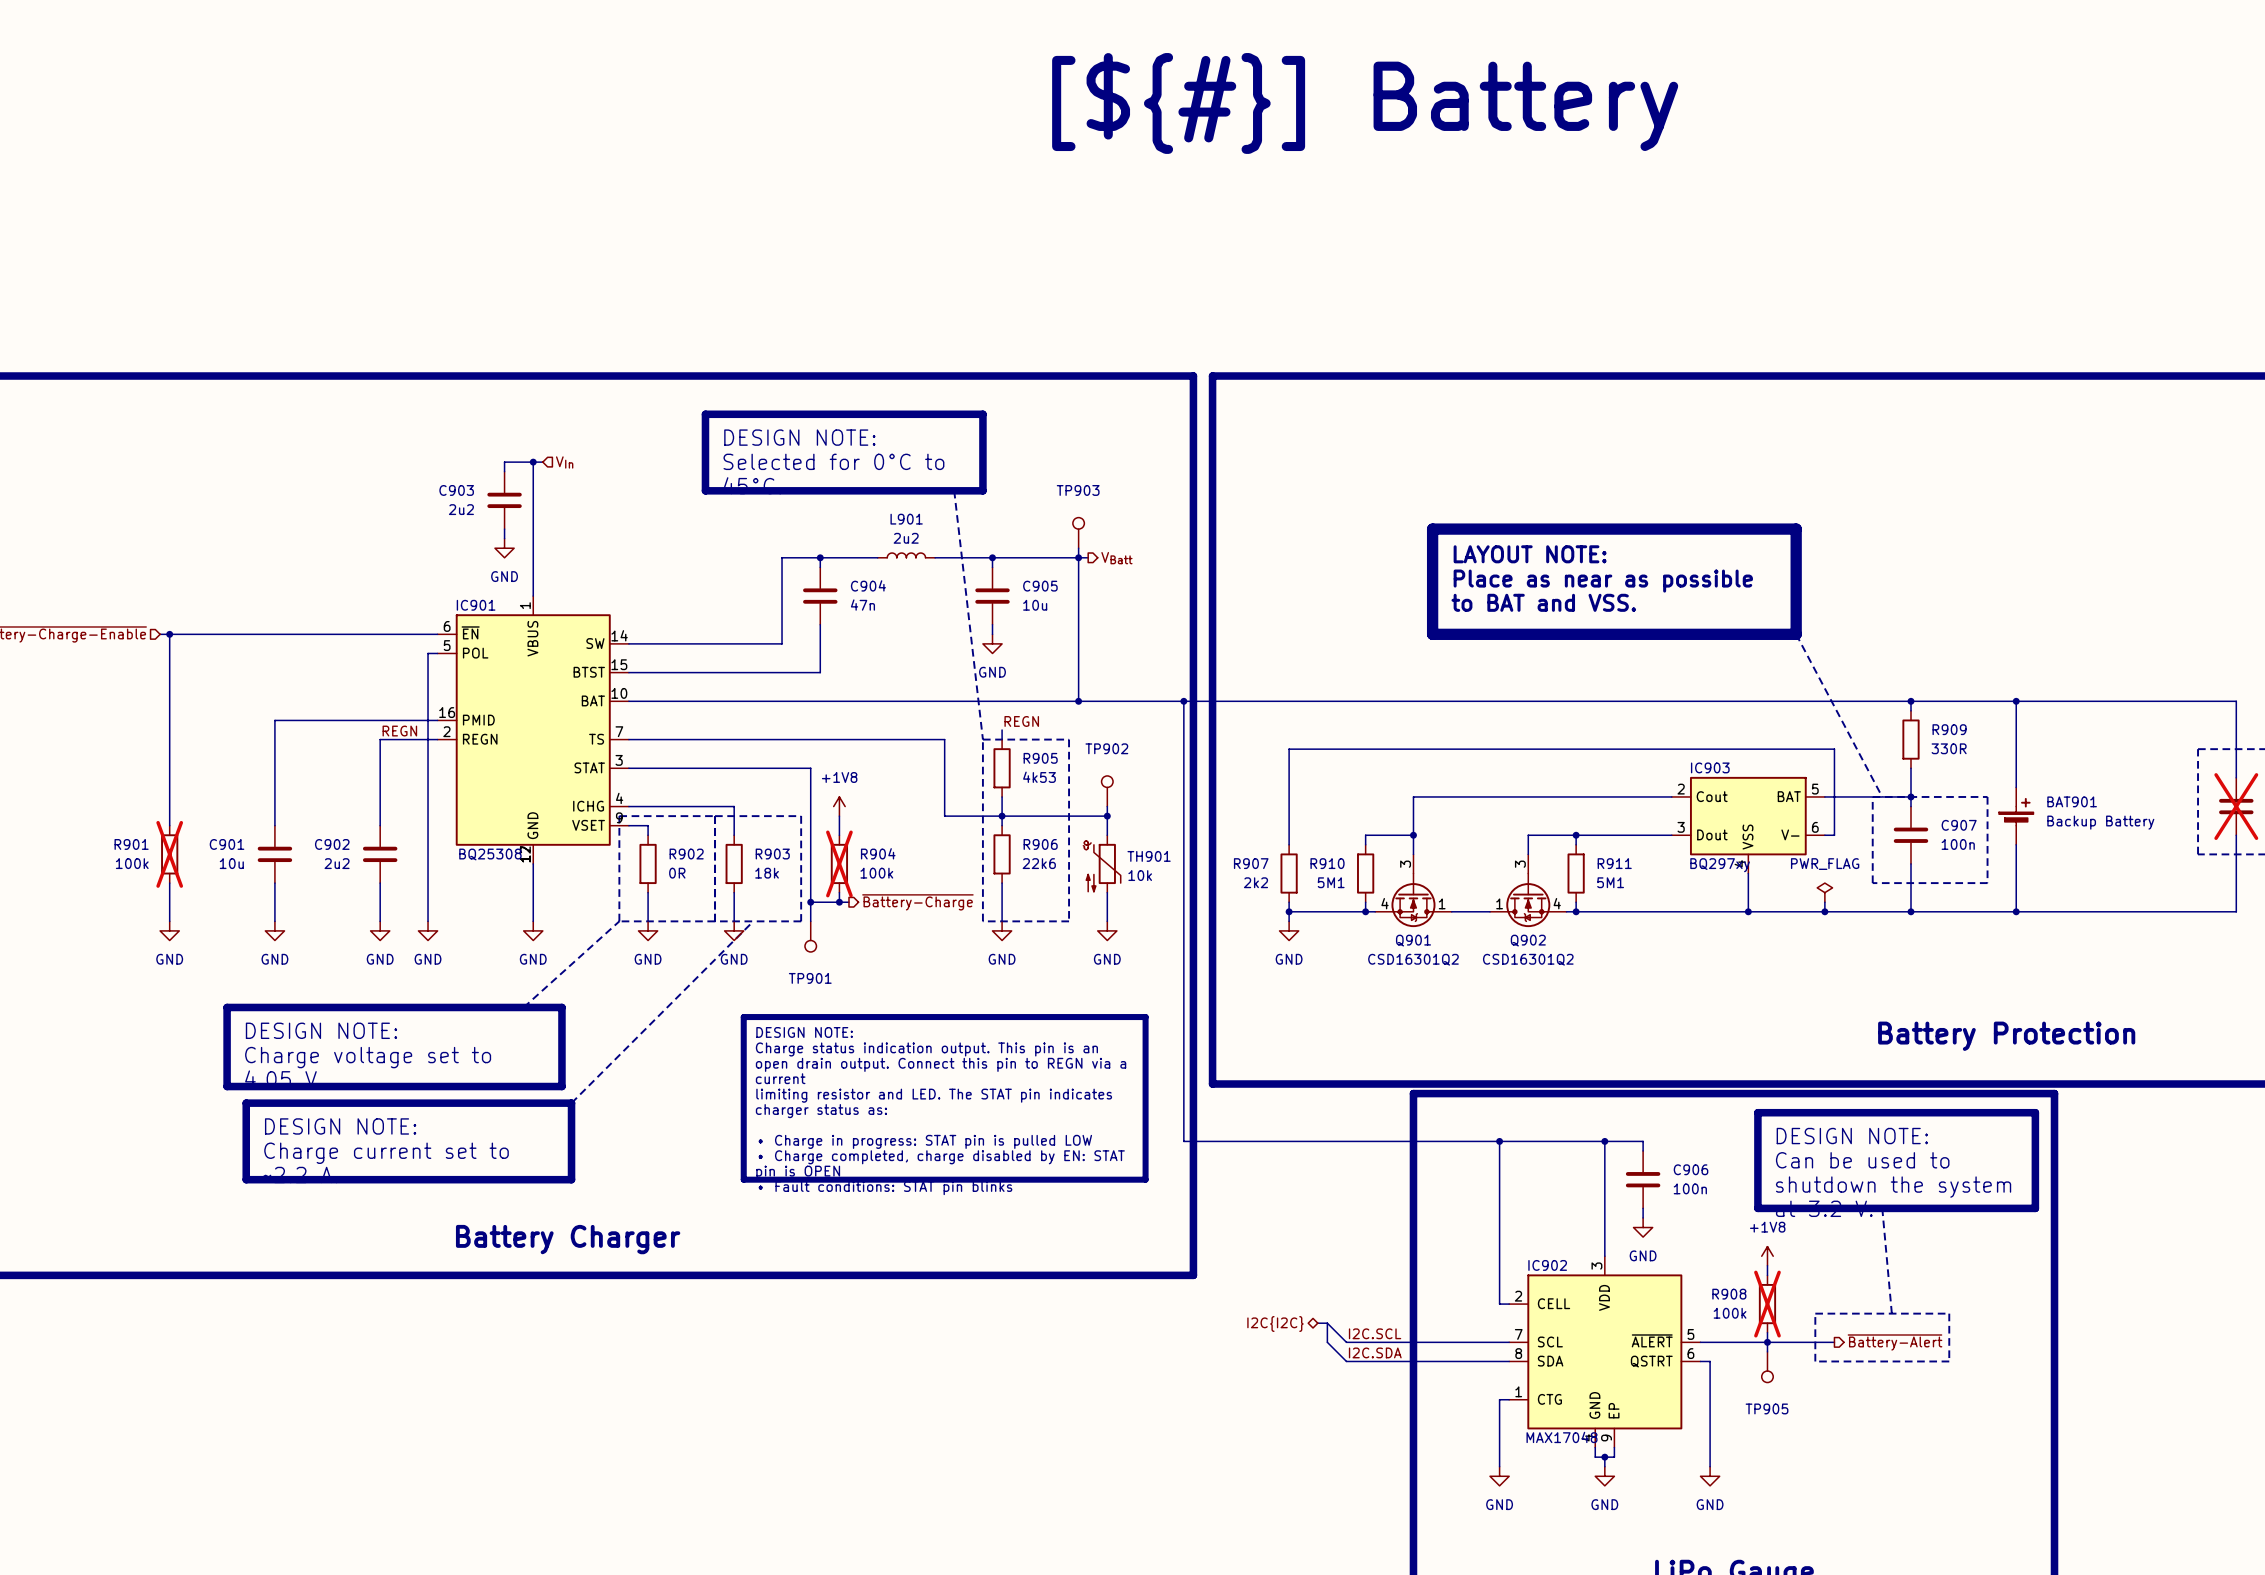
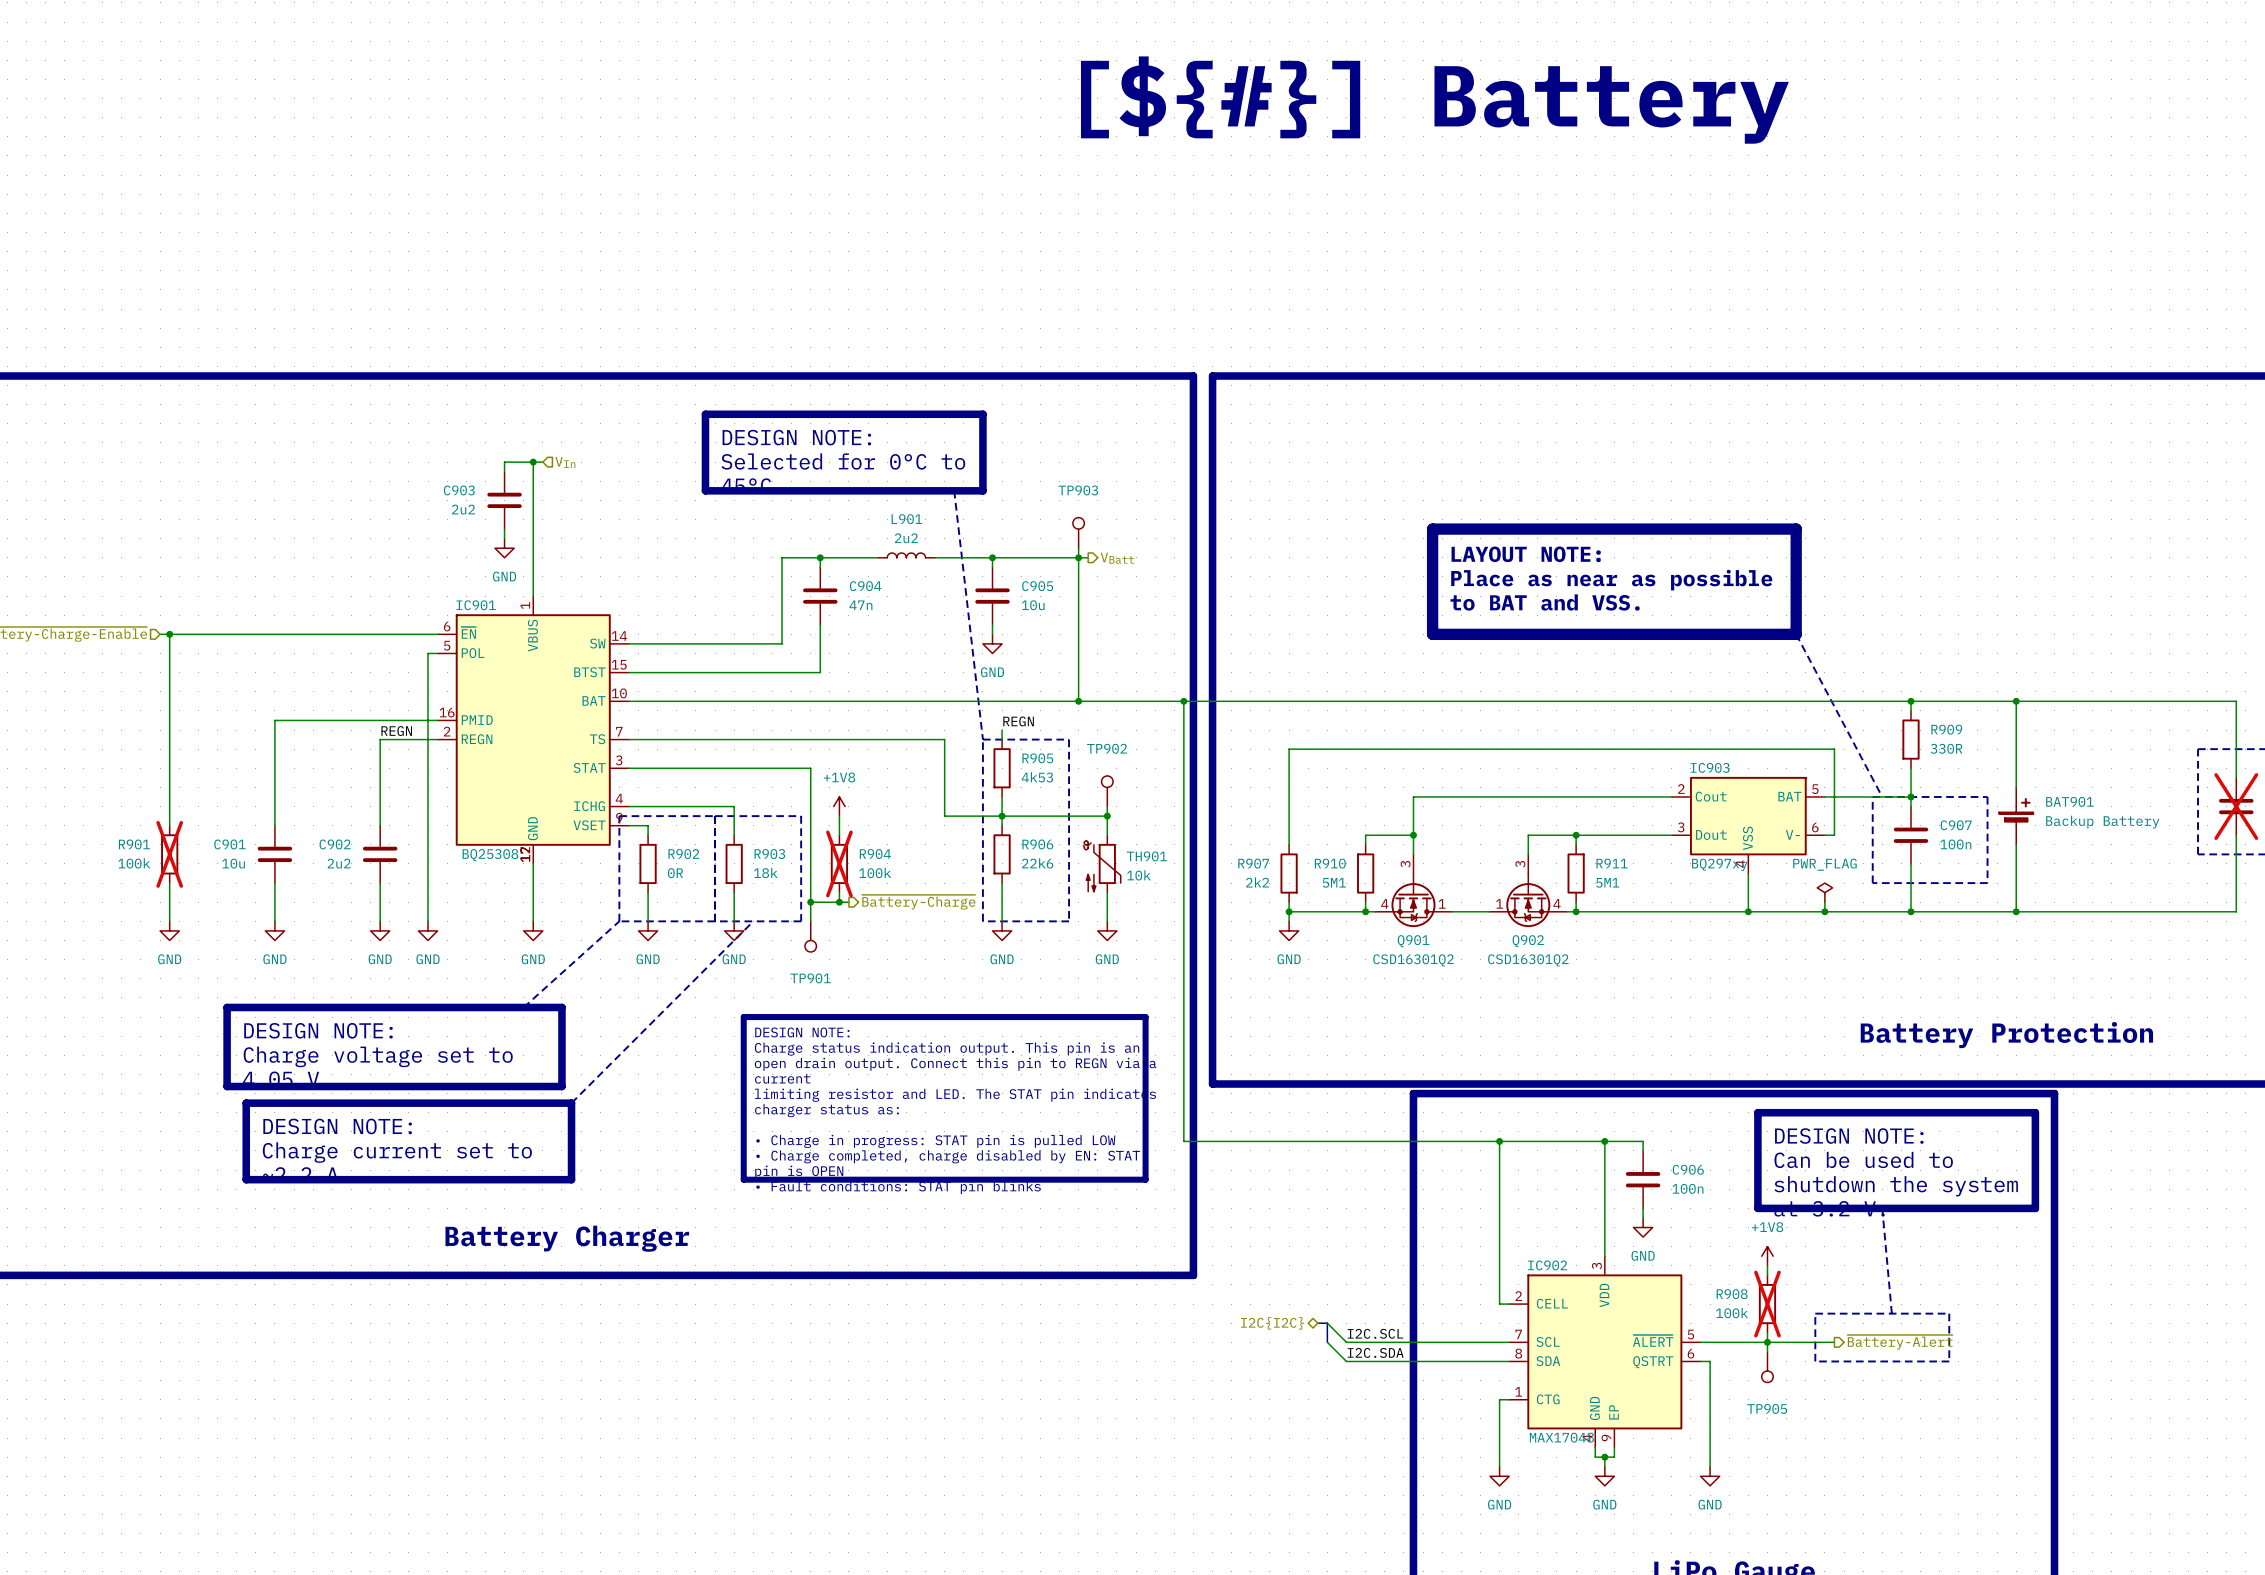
text position: [${#}] Battery (1365, 103) -> [${#}] Battery (1434, 100)

